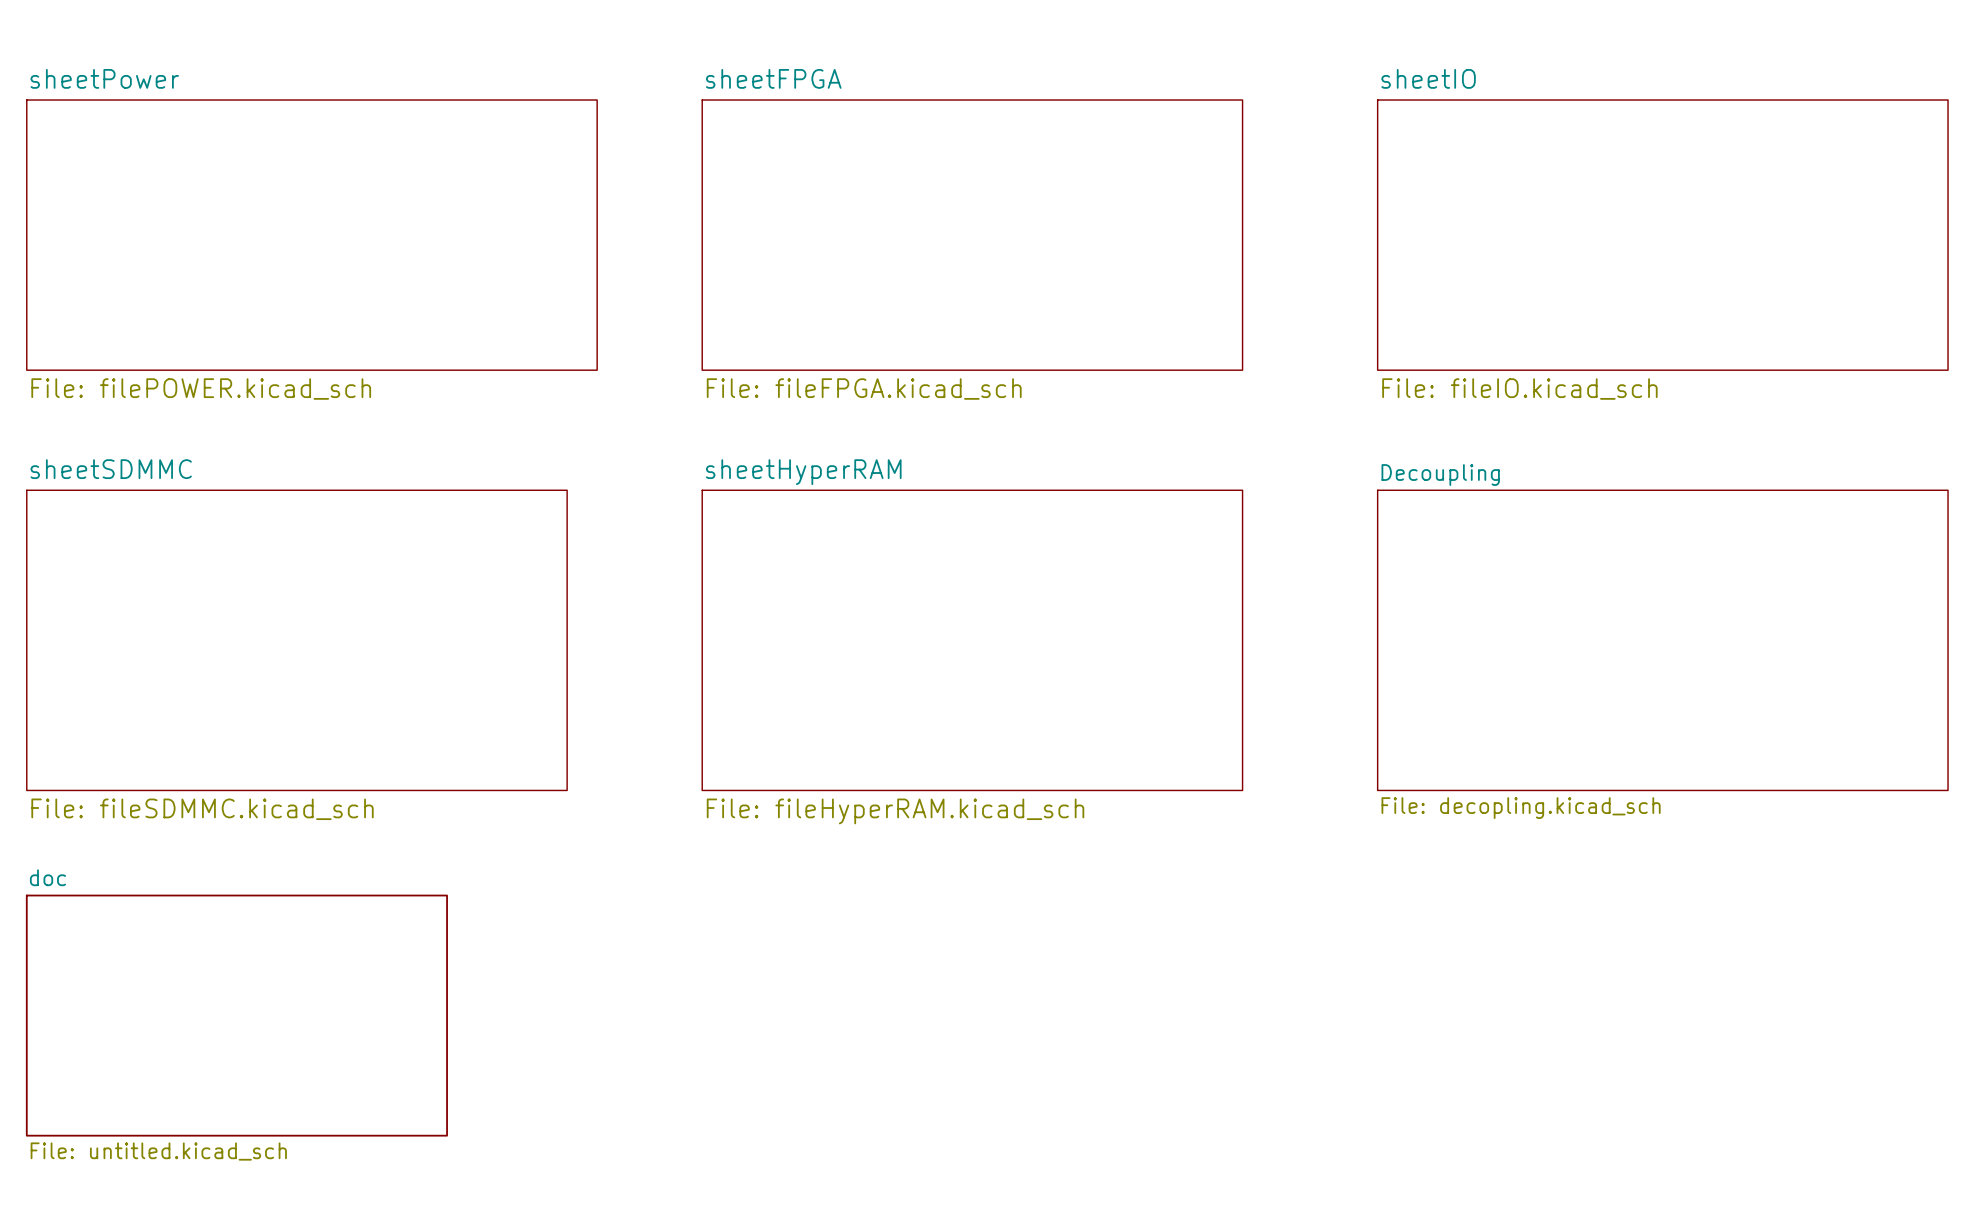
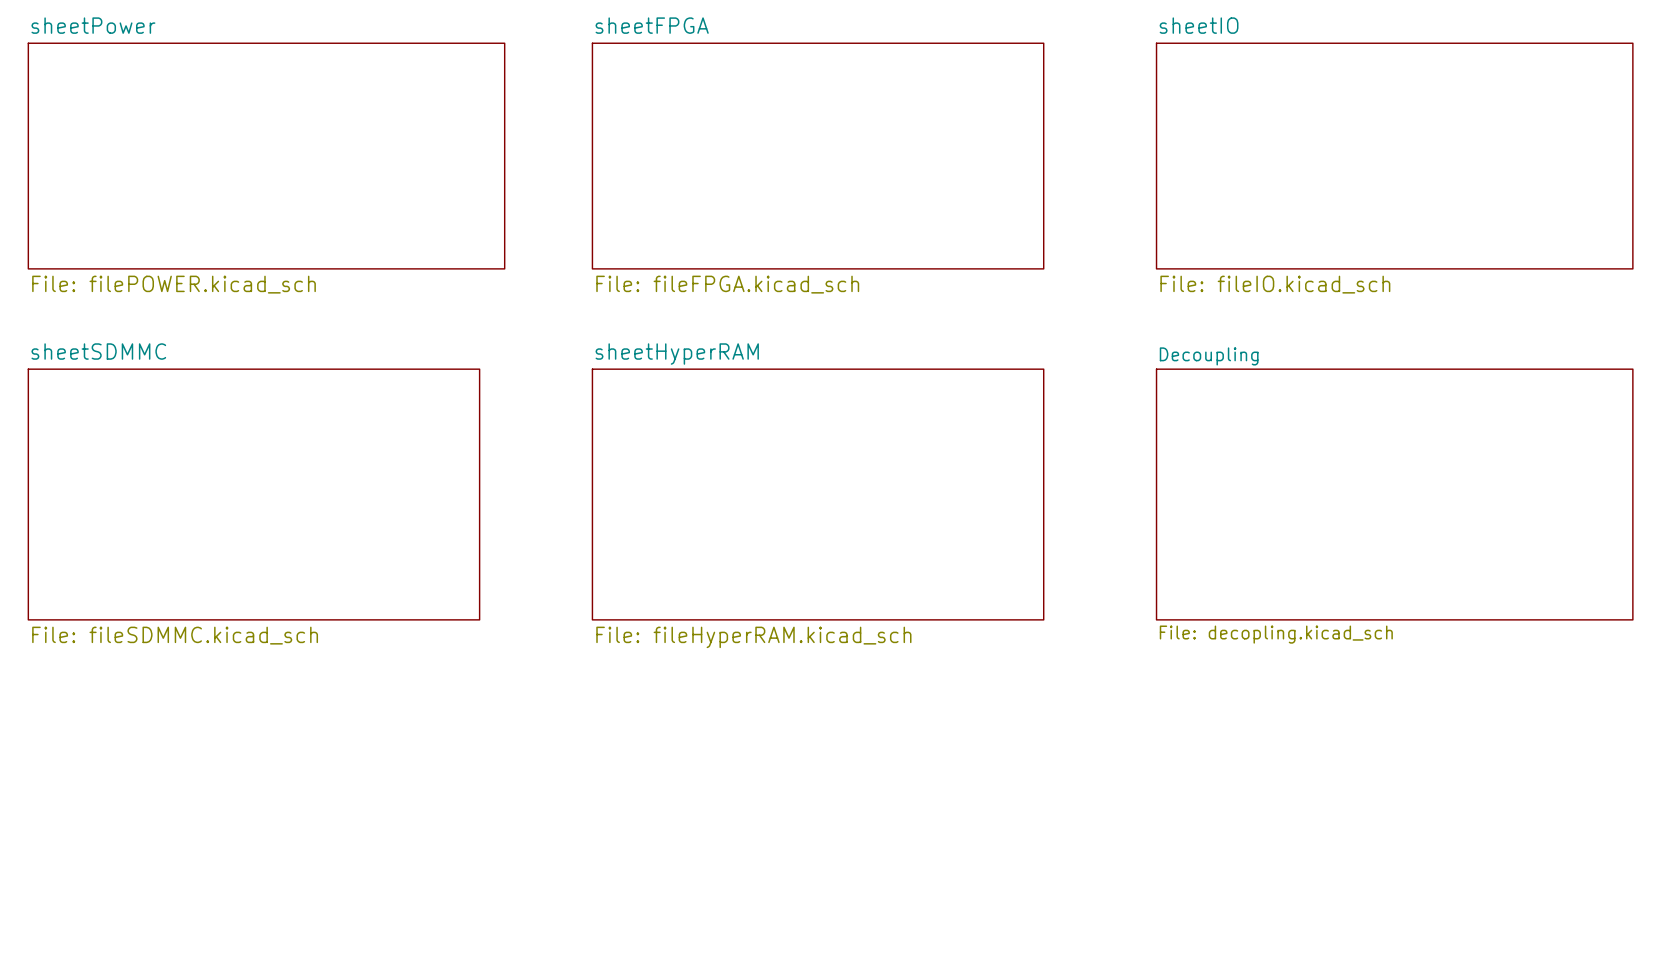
sheet doc: File: untitled.kicad_sch (236, 1015) -> none

